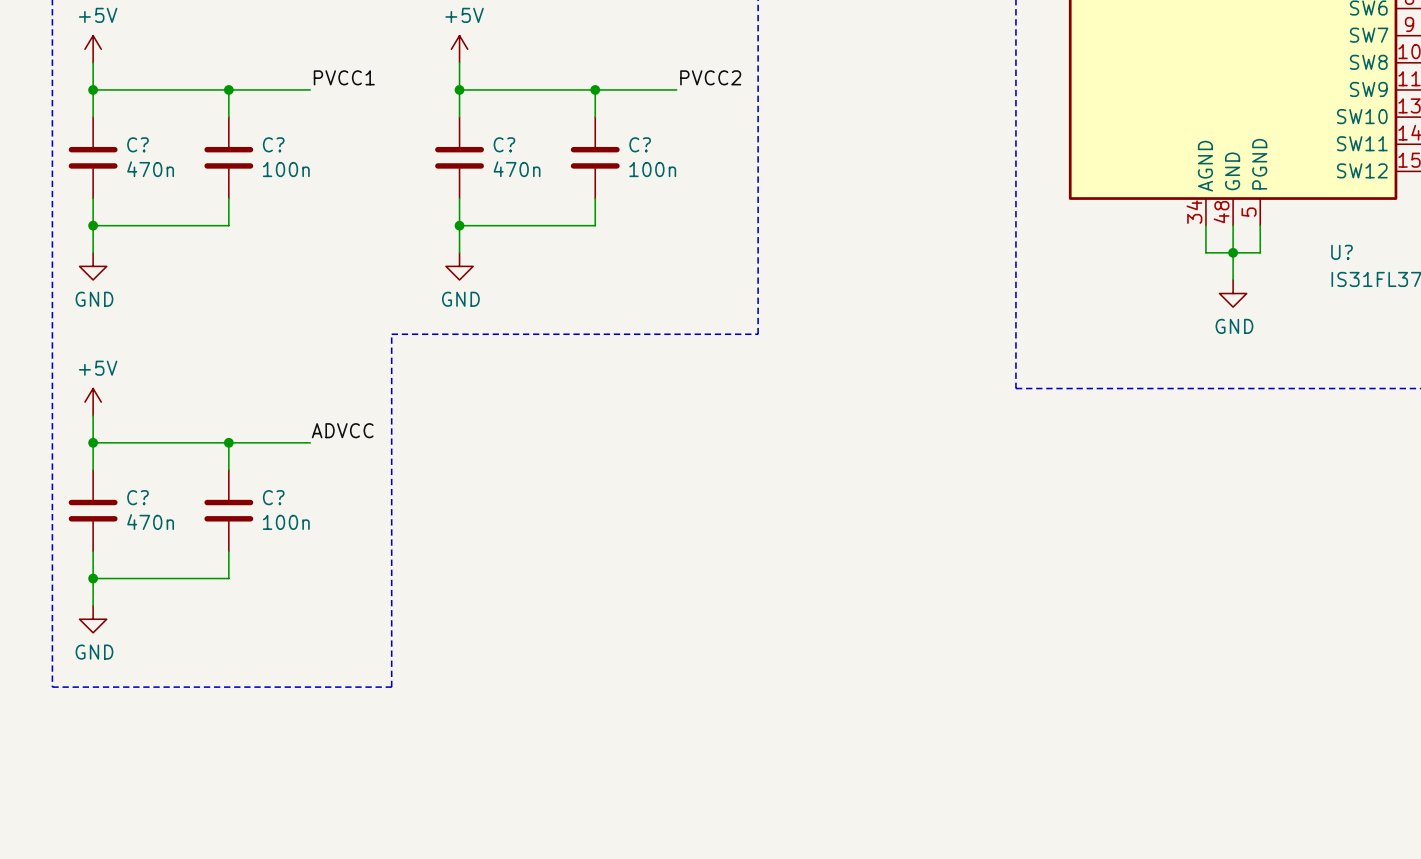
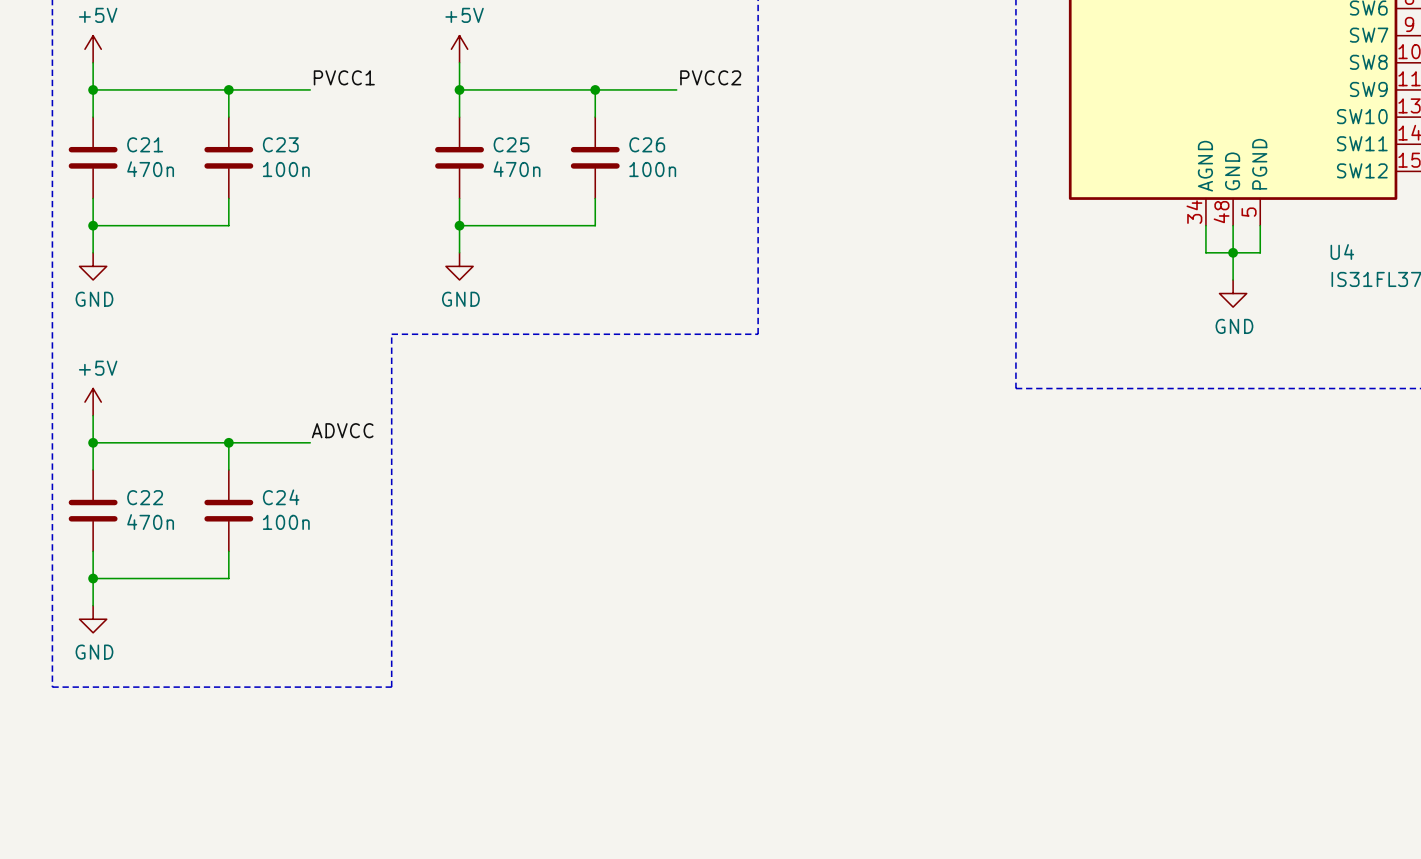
C? name: C? (138, 144) -> C21 (145, 144)
C? name: C? (273, 144) -> C23 (280, 144)
C? name: C? (504, 144) -> C25 (511, 144)
C? name: C? (640, 144) -> C26 (647, 144)
U? name: U? (1341, 252) -> U4 (1342, 251)
C? name: C? (138, 497) -> C22 (145, 497)
C? name: C? (273, 497) -> C24 (281, 497)

